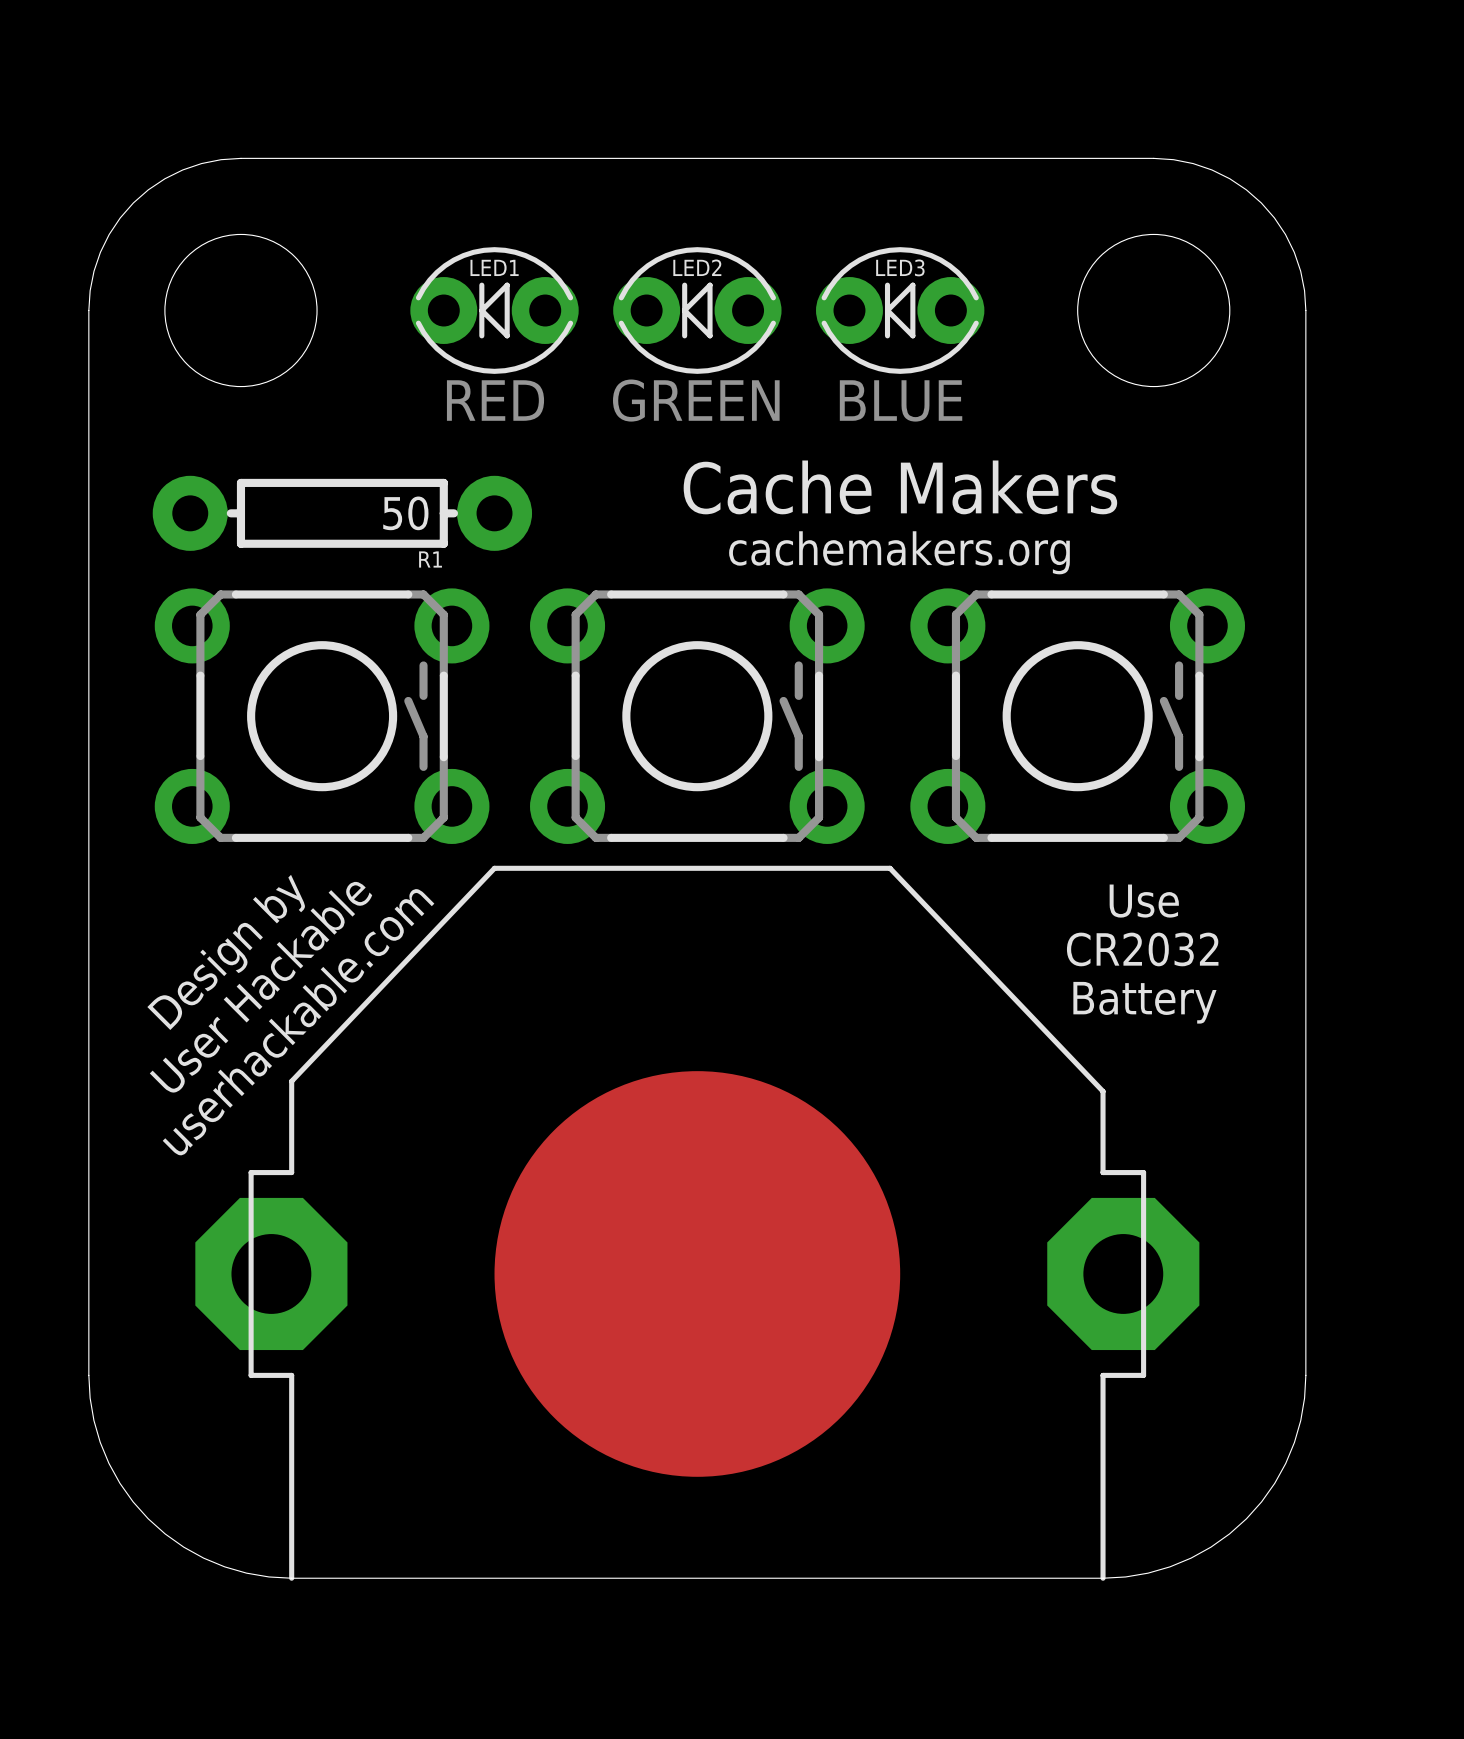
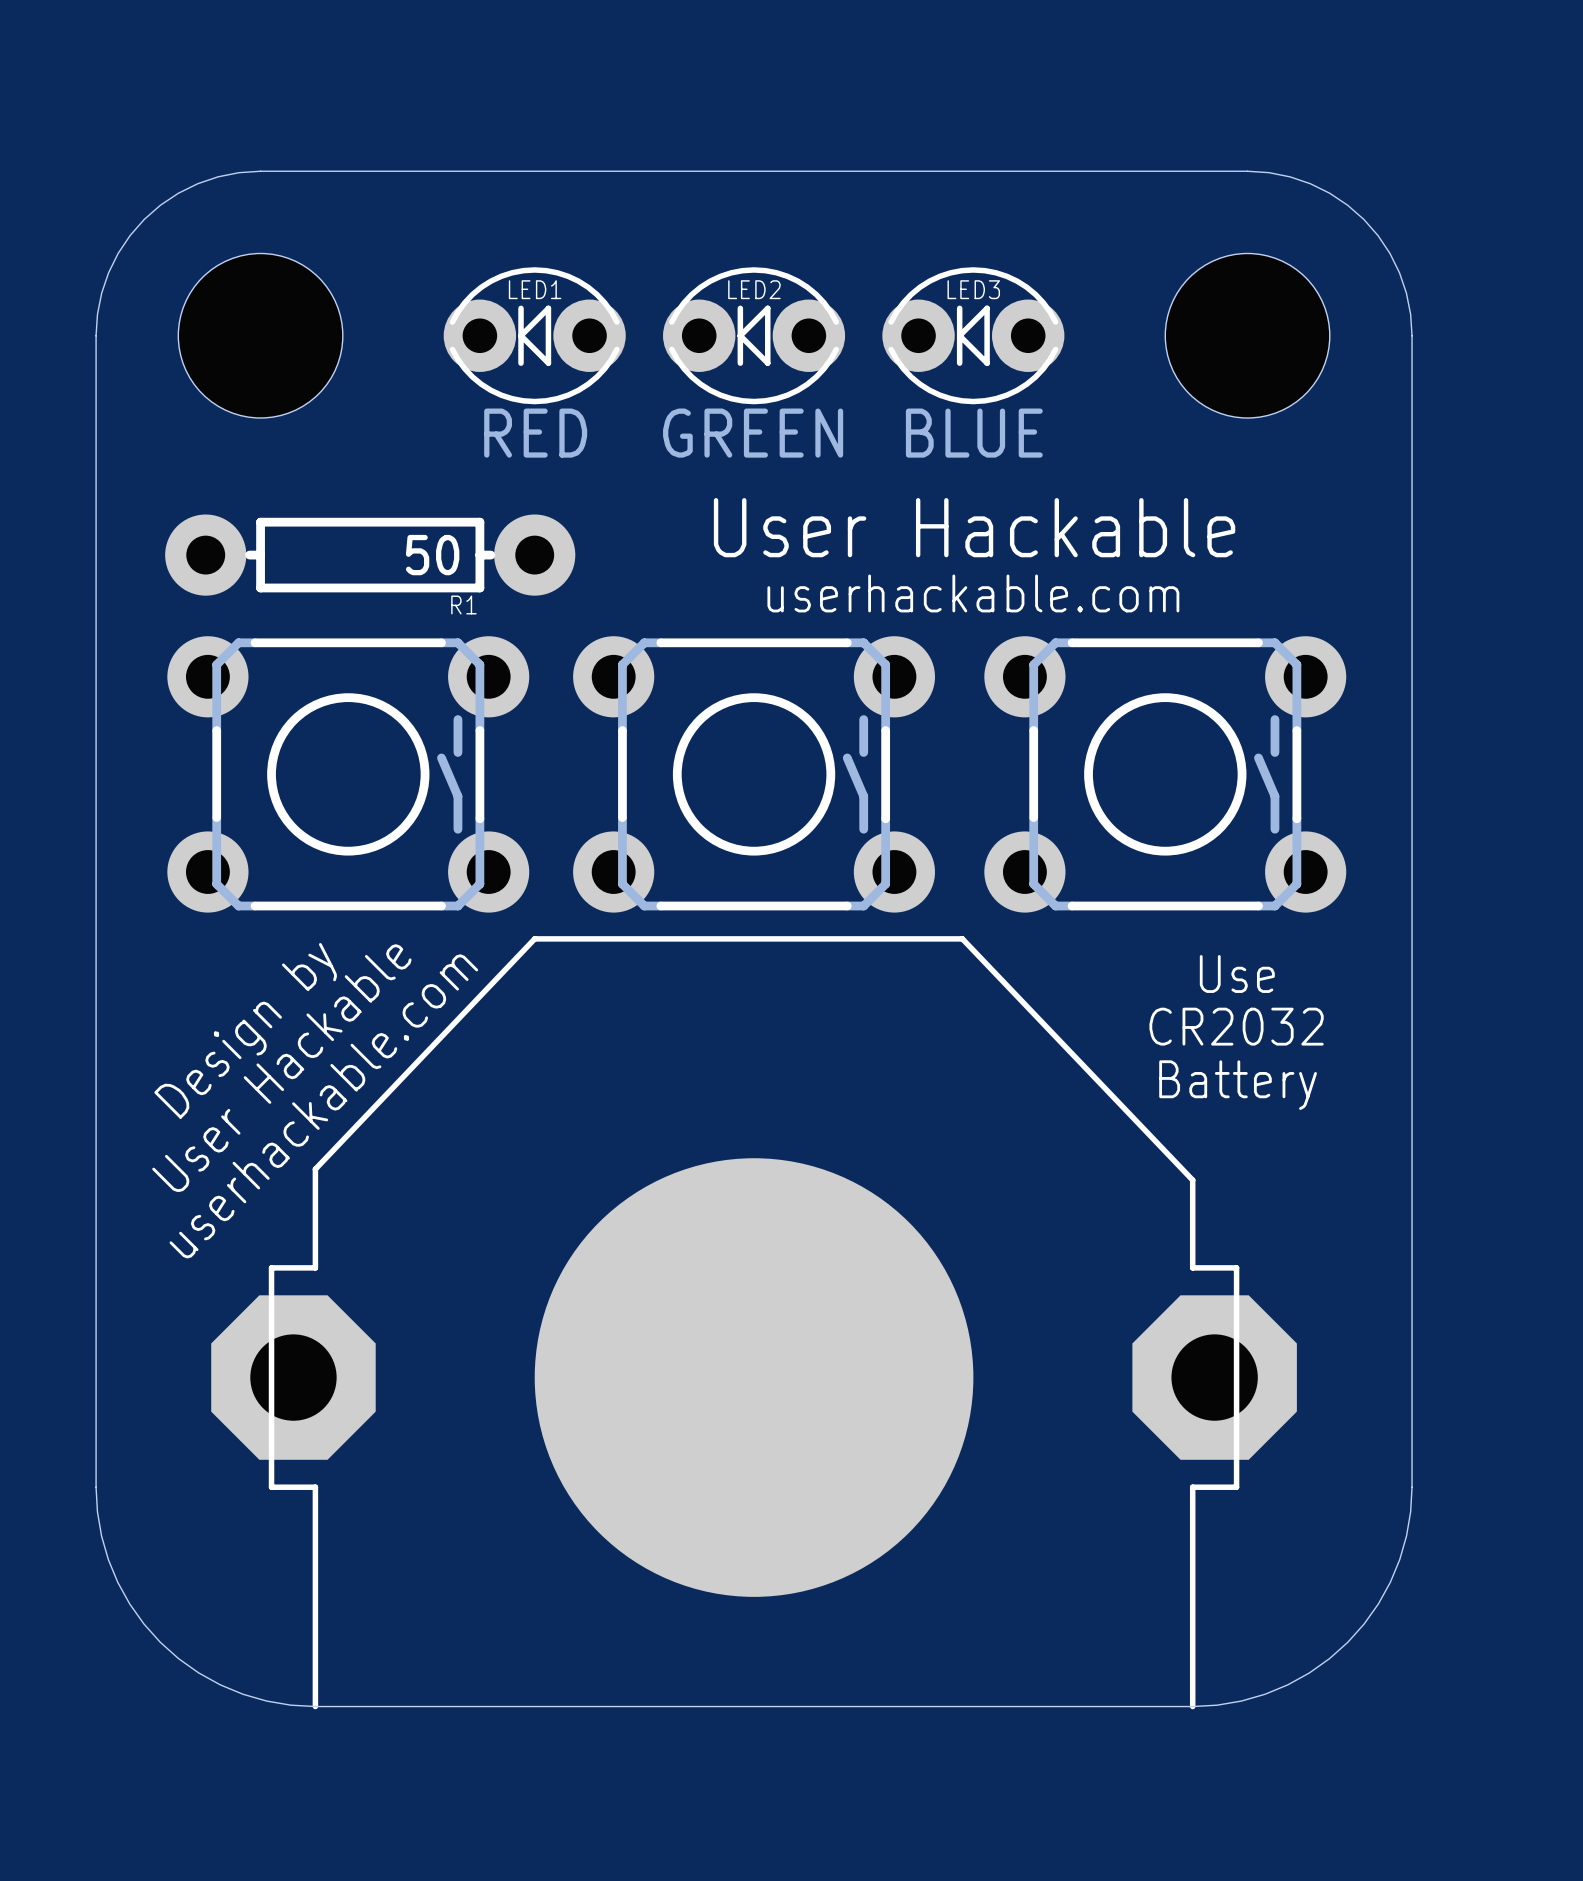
text: Cache Makers (900, 487) -> User Hackable (974, 527)
text: cachemakers.org (899, 552) -> userhackable.com (973, 593)

